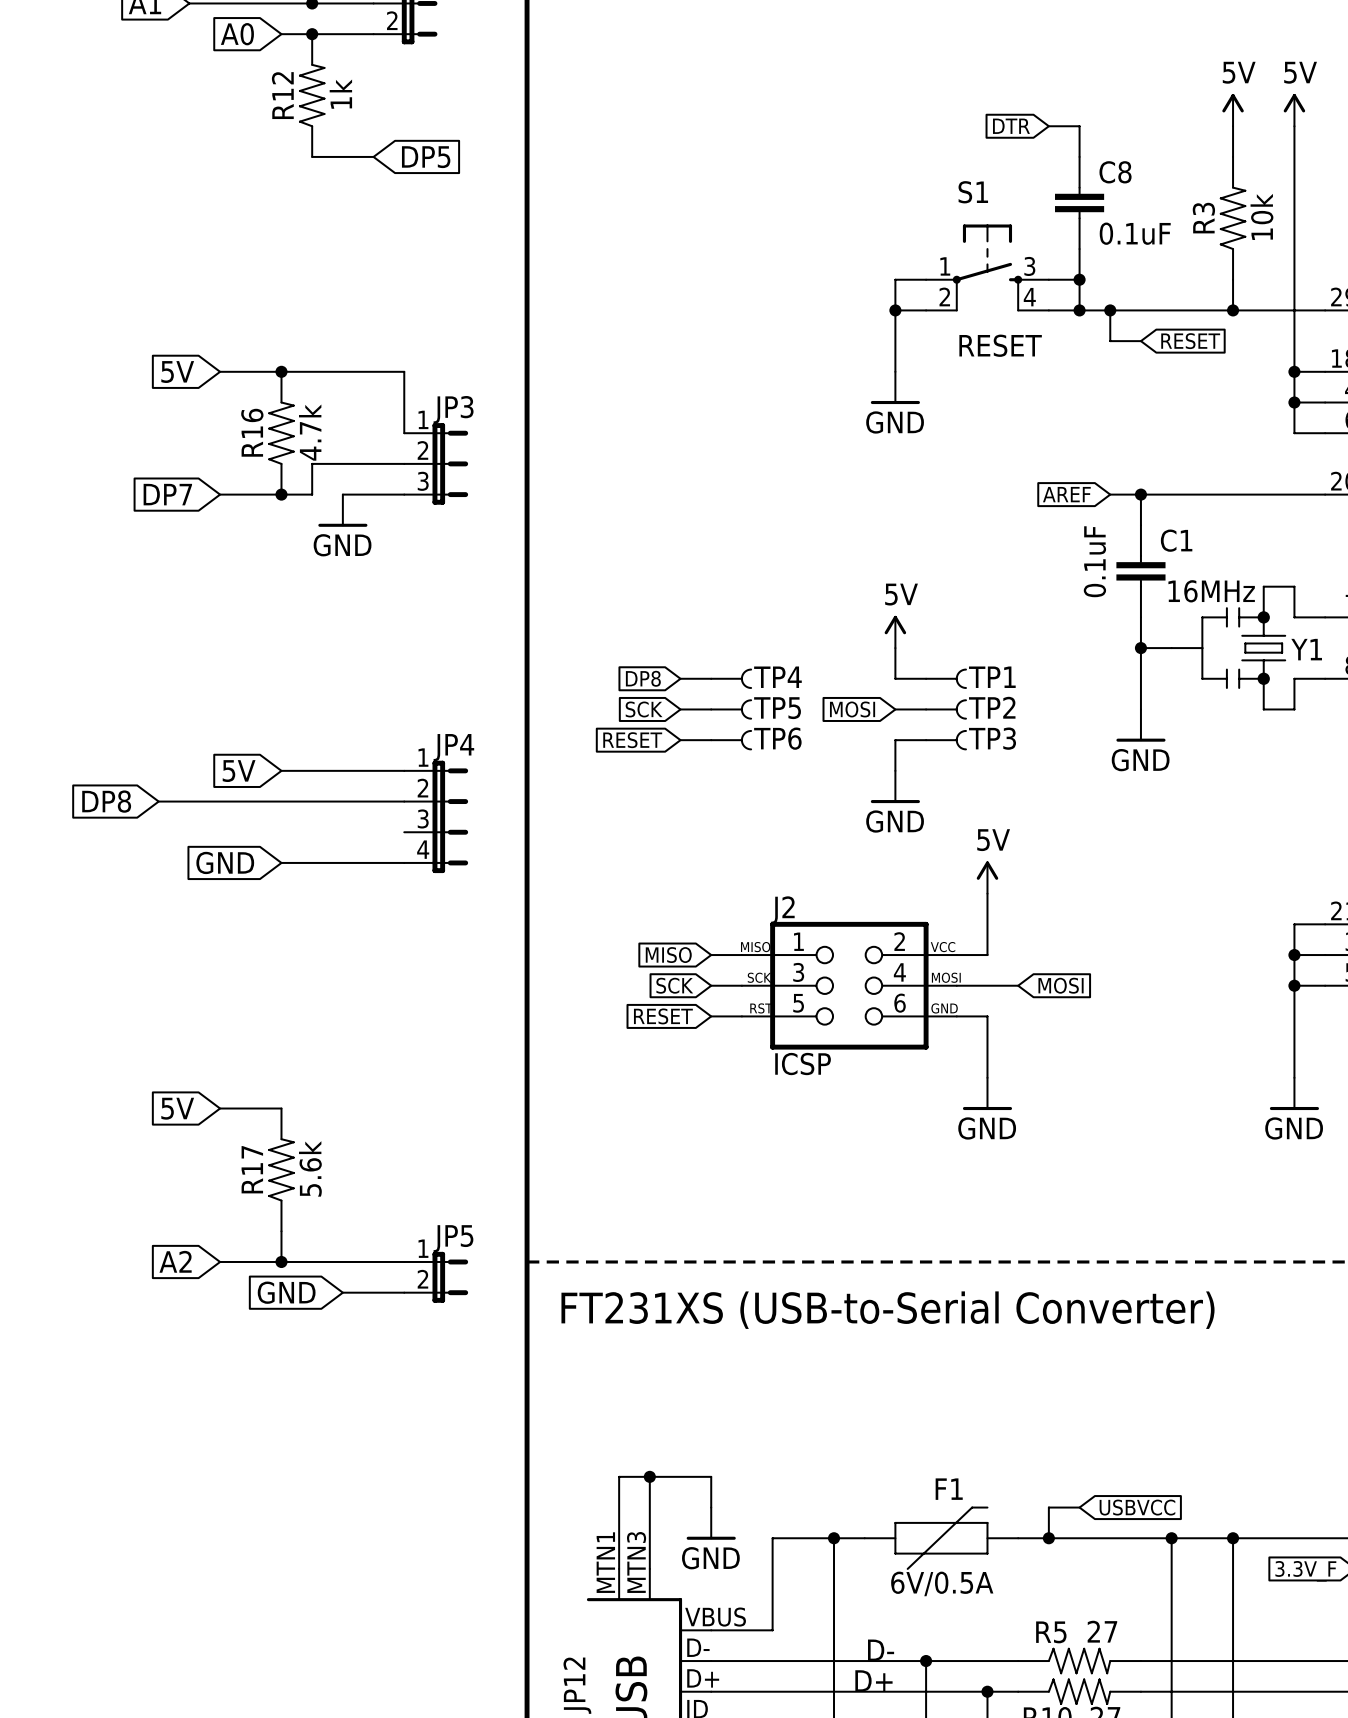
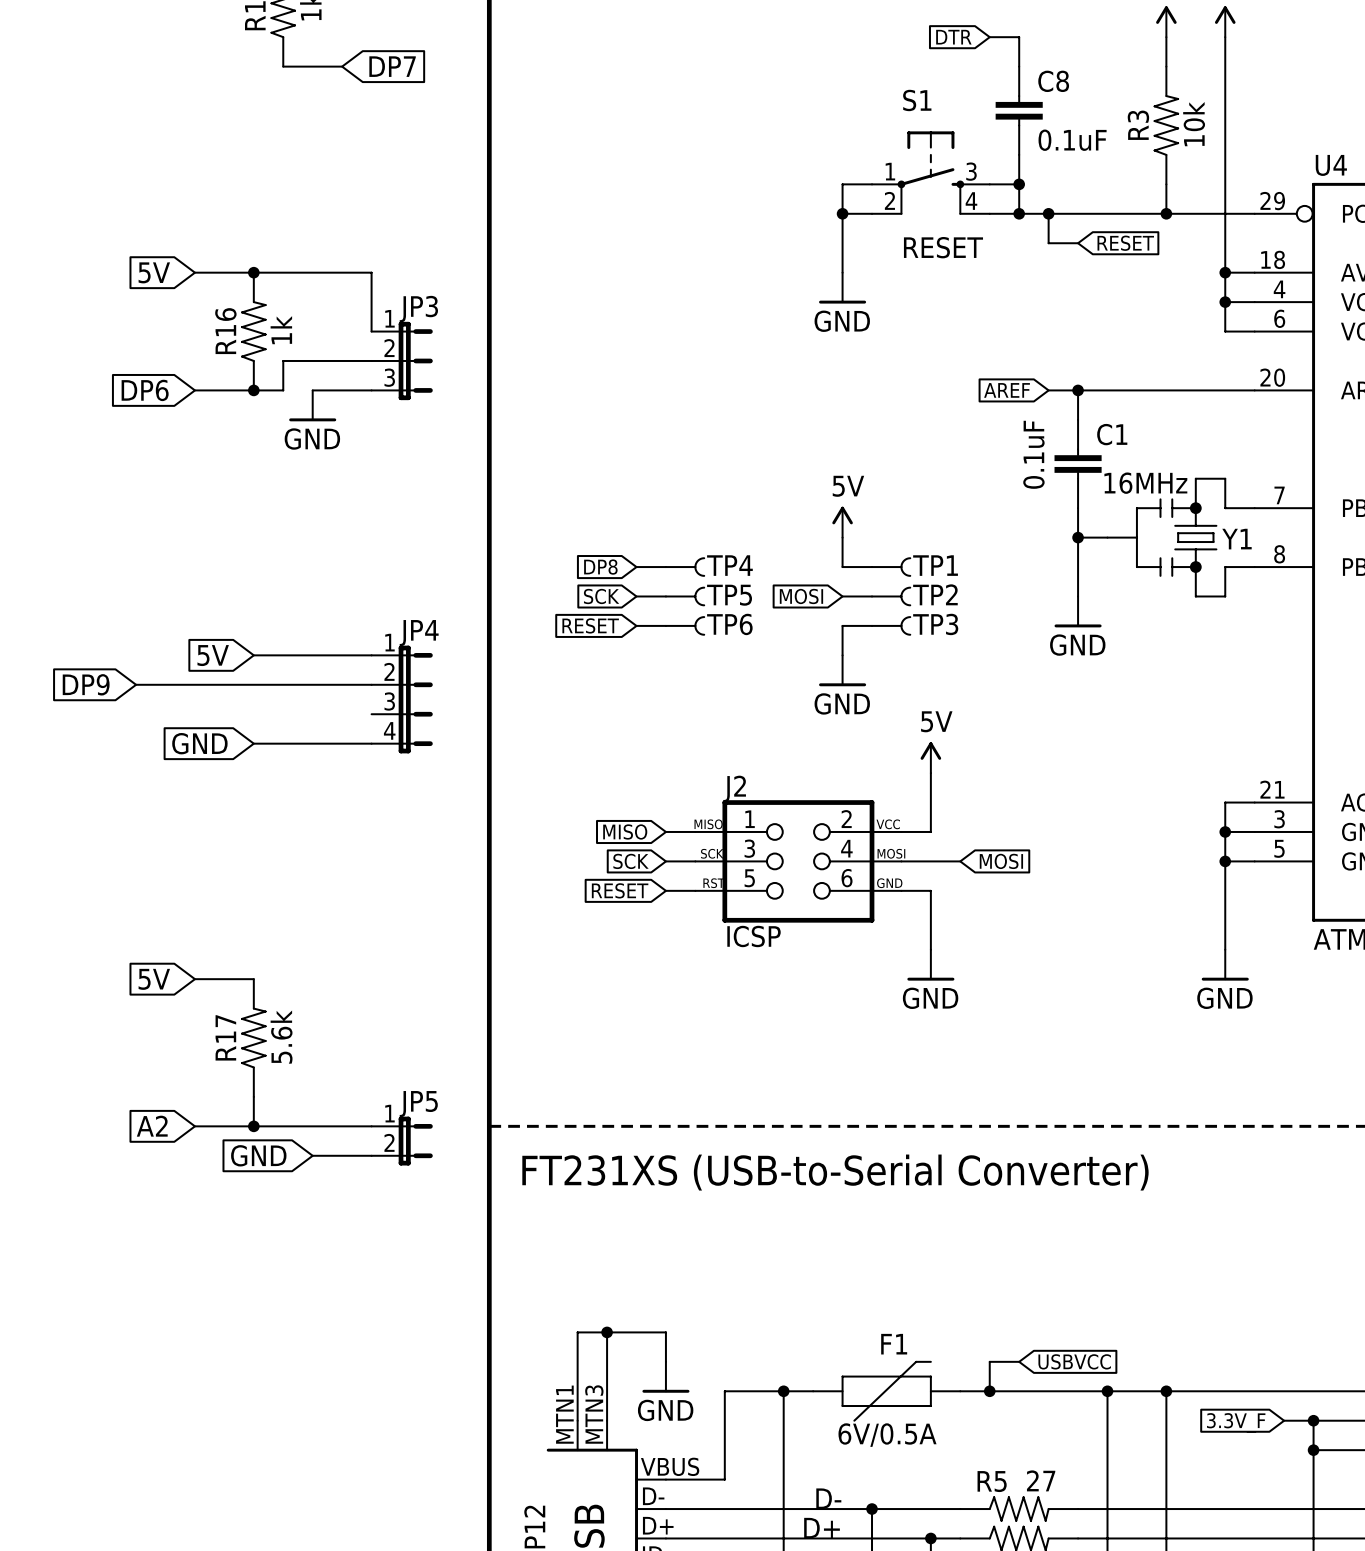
global label: DP5 (426, 157) -> DP7 (392, 66)
R16 value: 4.7k (310, 432) -> 1k (281, 330)
global label: DP7 (167, 494) -> DP6 (145, 390)
global label: DP8 (106, 801) -> DP9 (86, 684)

